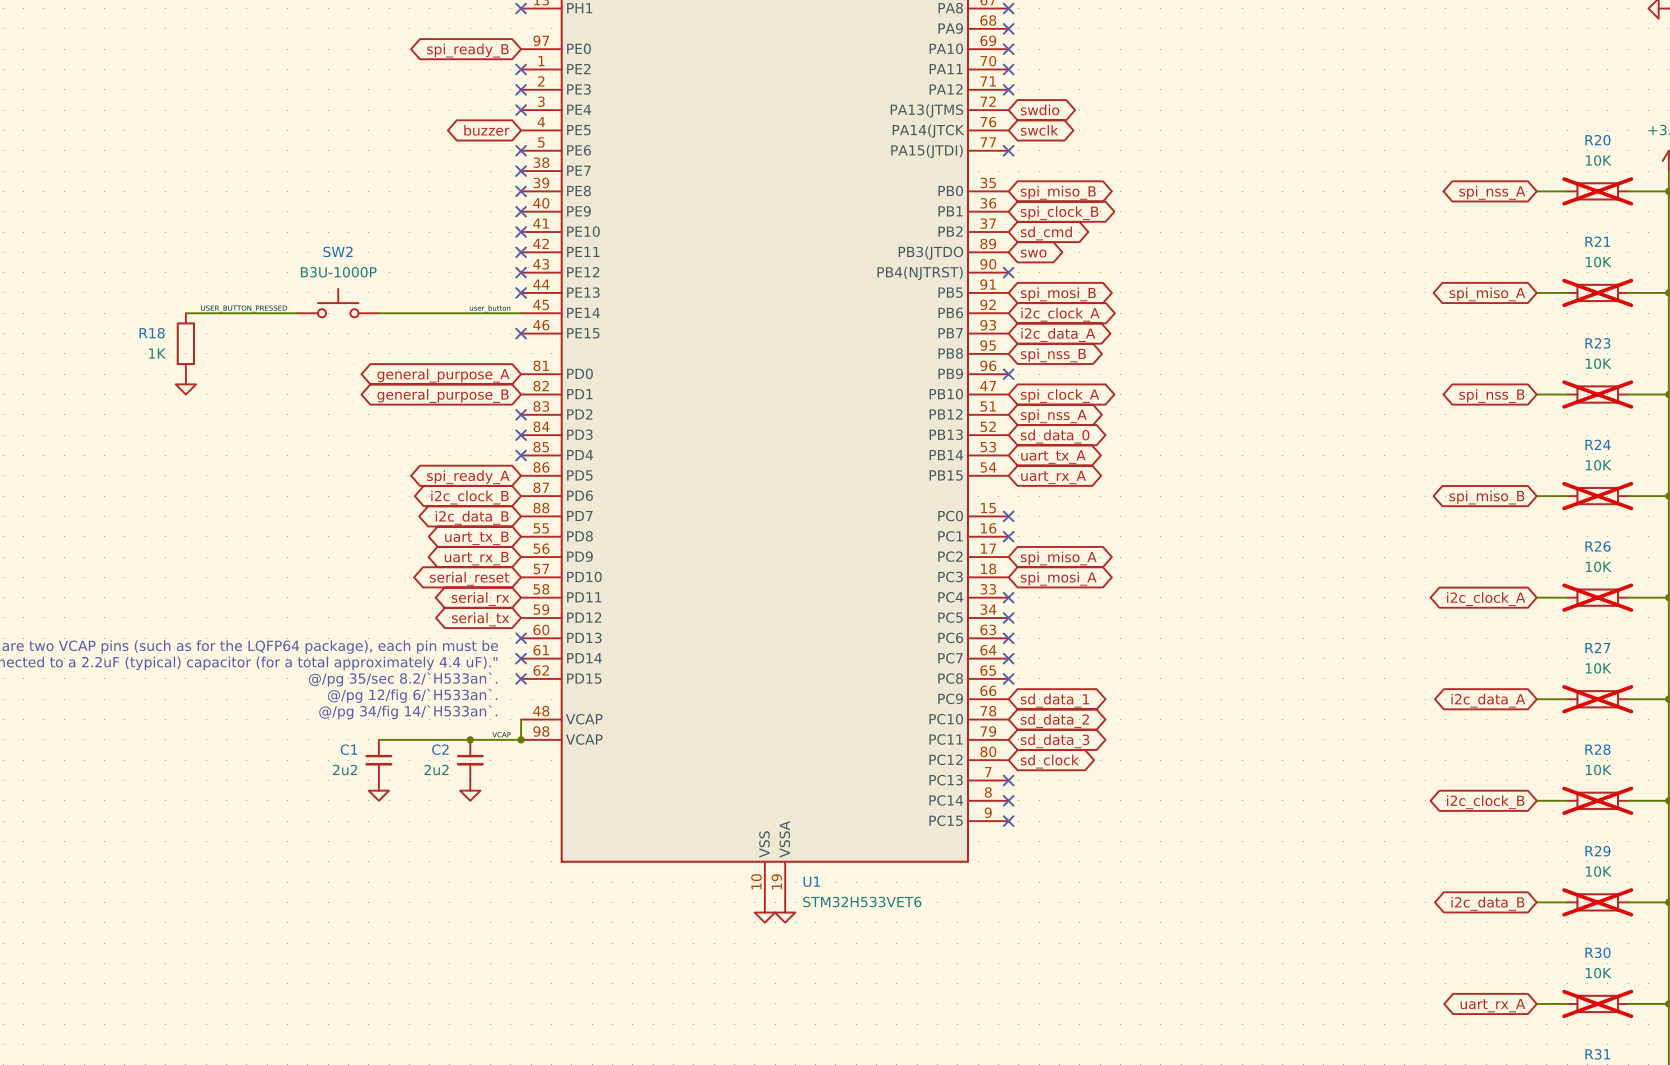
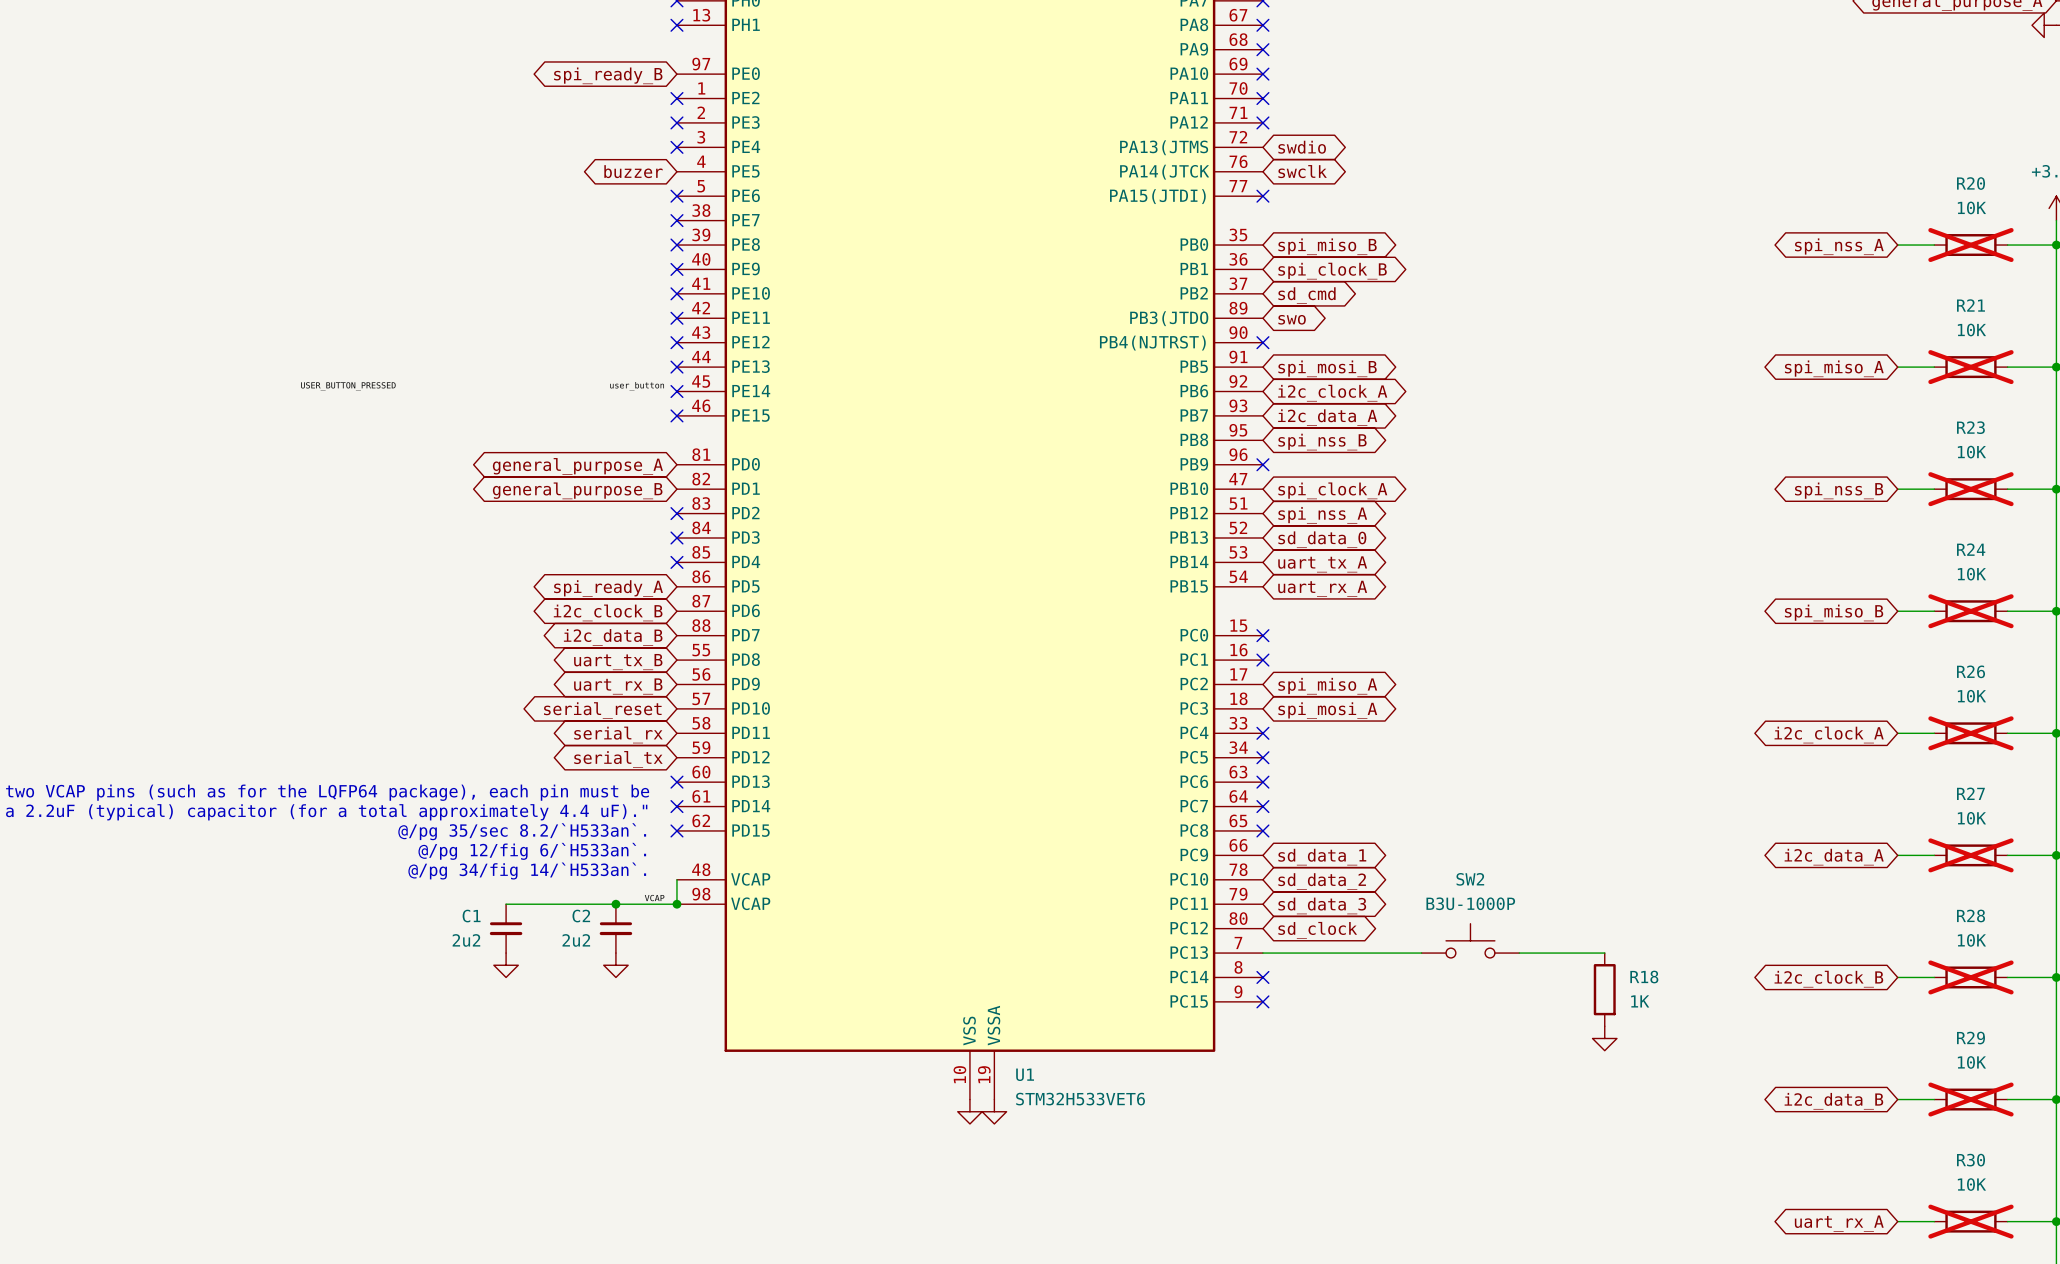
SW2 position: (338, 303) -> (1470, 940)
wire: (185, 313) (297, 313) -> none
wire: (378, 313) (521, 313) -> none
no-connect mark: none -> (676, 391)
R18 name position: R18 (152, 333) -> R18 (1644, 977)
R18 position: (185, 343) -> (1604, 989)
R18 value position: 1K (157, 353) -> 1K (1640, 1001)
power symbol: (185, 384) -> none
wire: none -> (1262, 953) (1421, 953)
no-connect mark: (1008, 780) -> none
wire: none -> (1519, 953) (1604, 953)
power symbol: none -> (1604, 1038)

